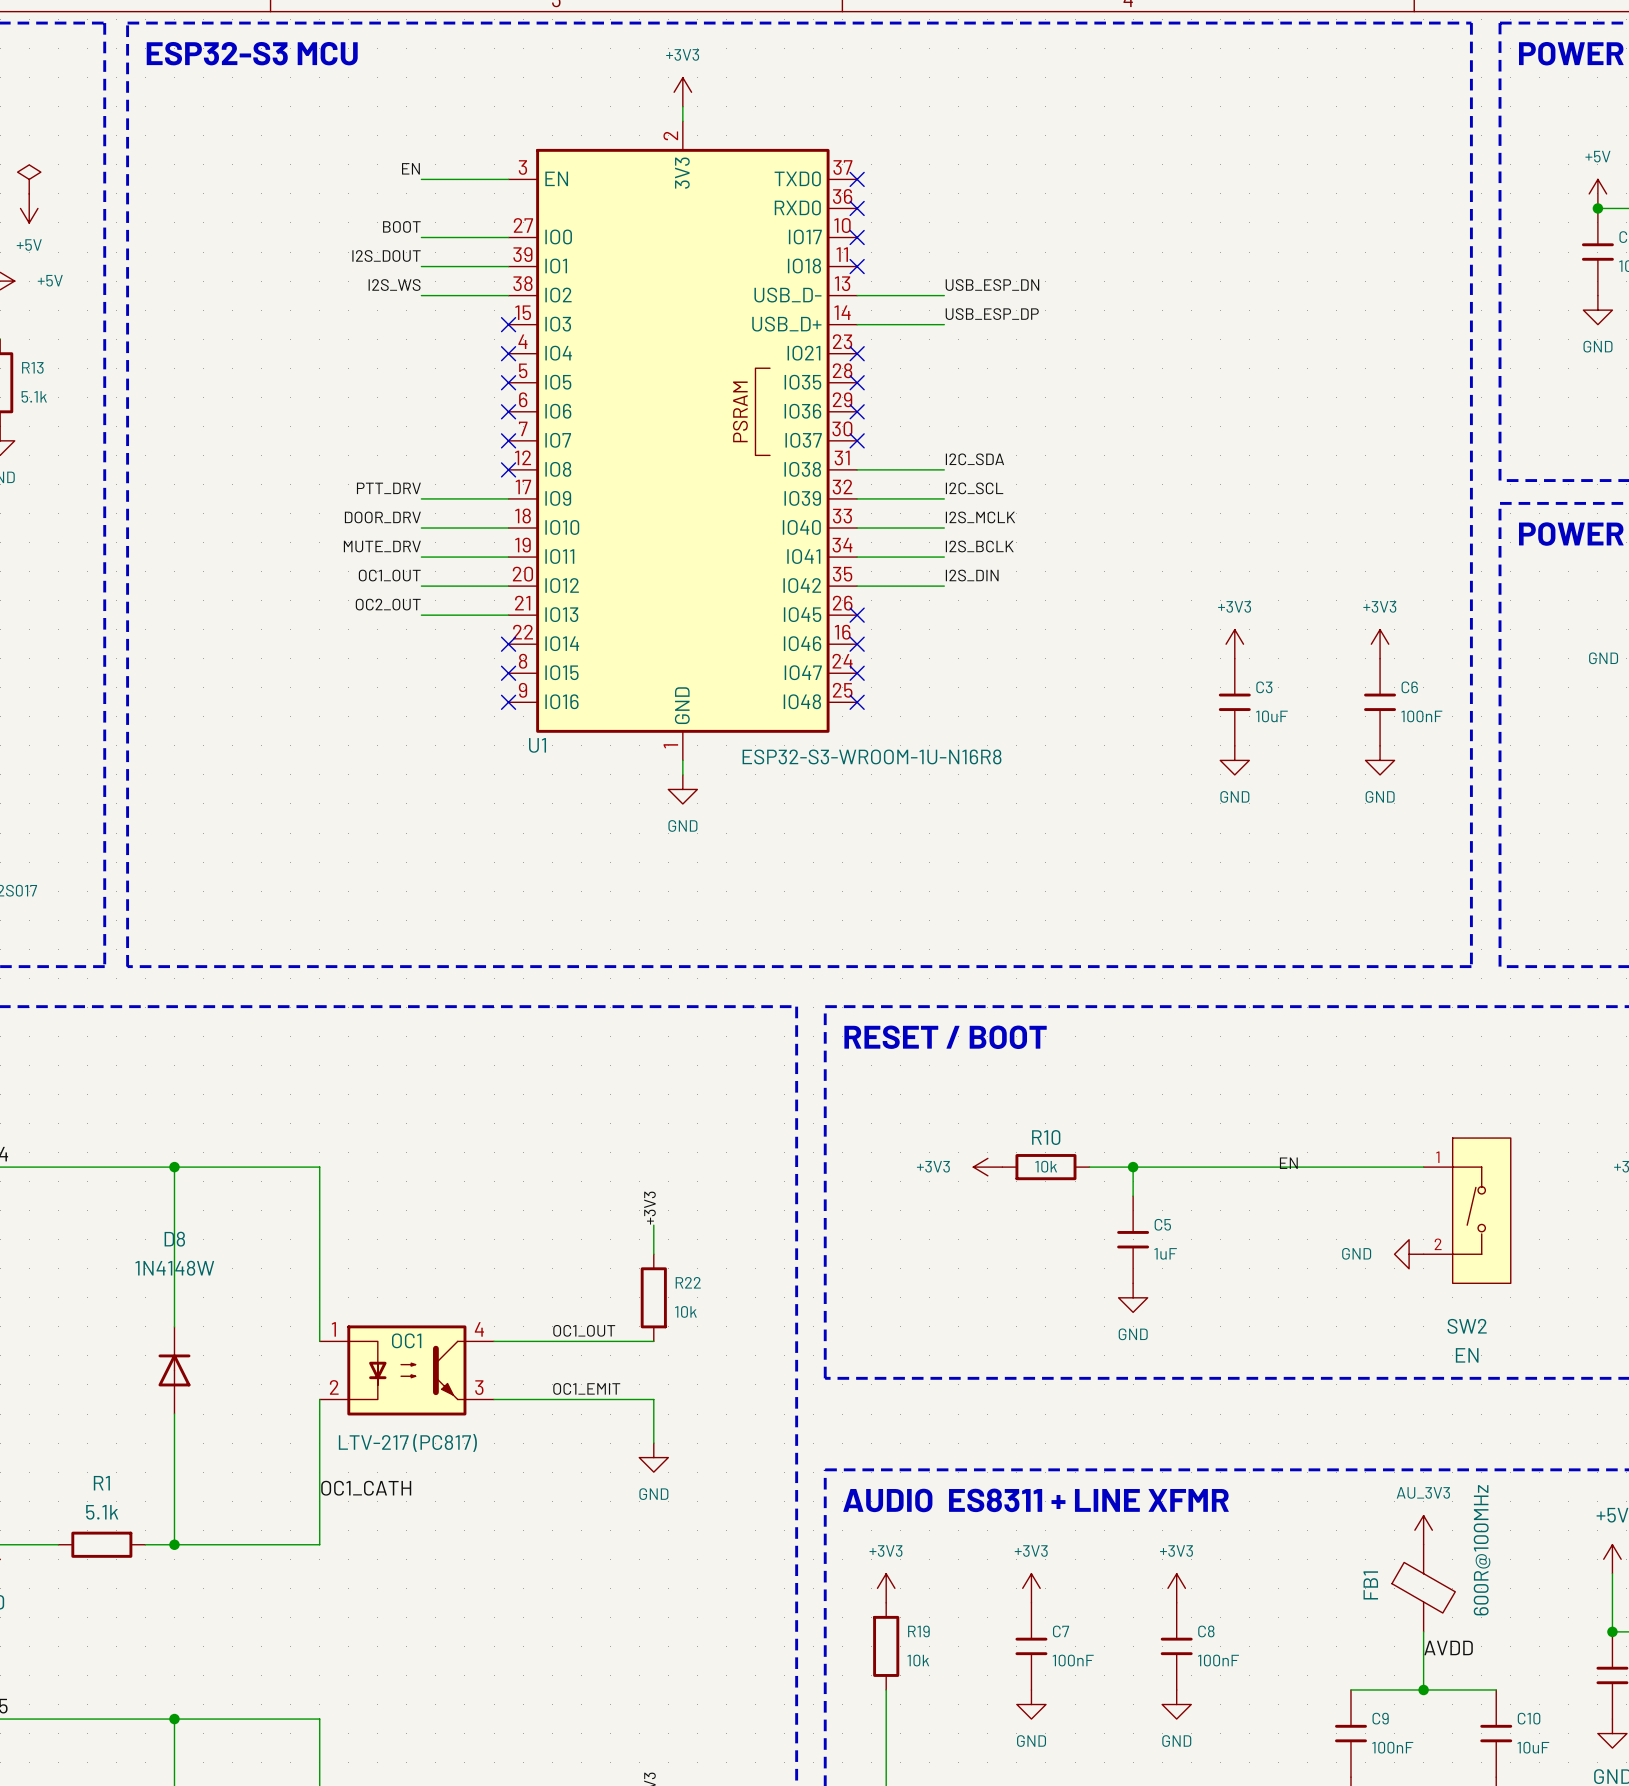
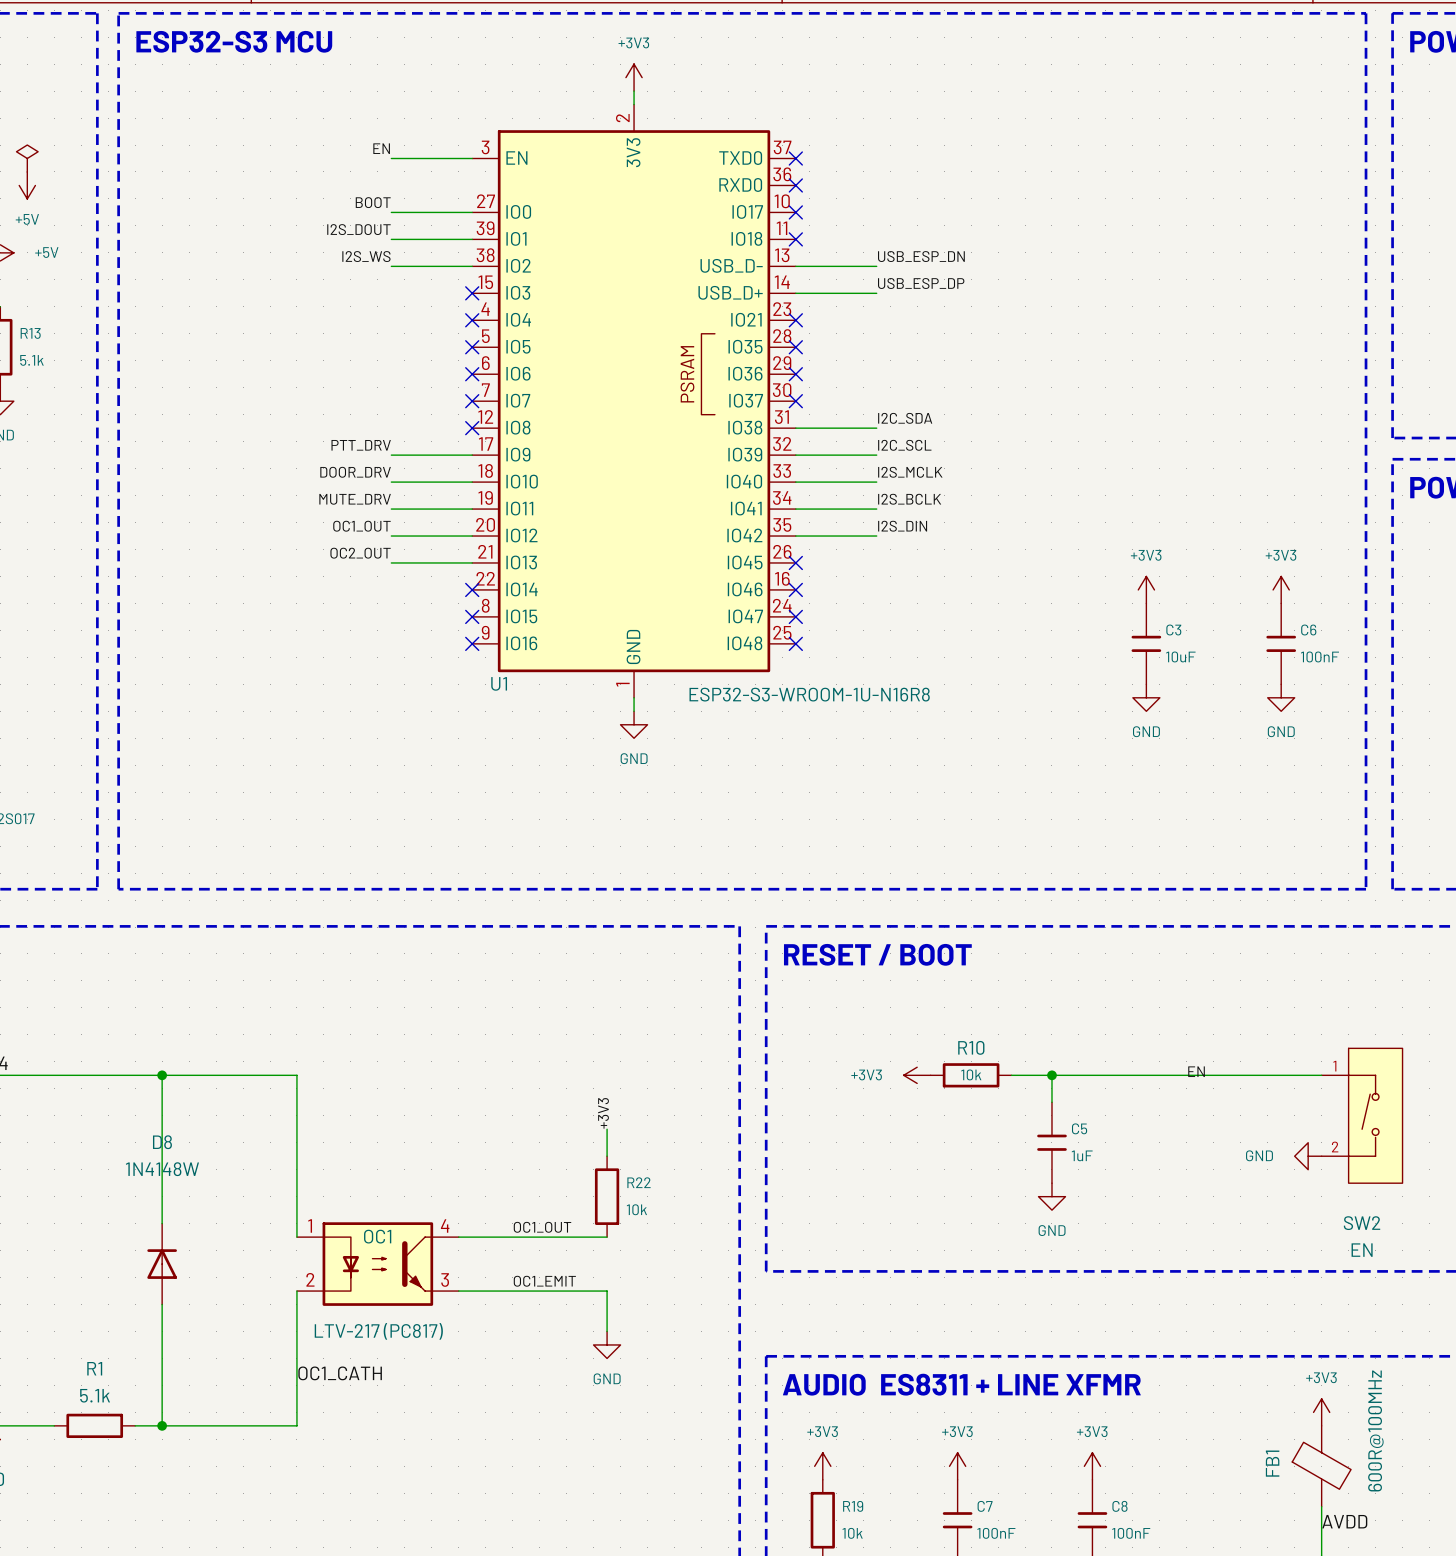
power symbol: AU_3V3 (1423, 1530) -> +3V3 (1321, 1412)

